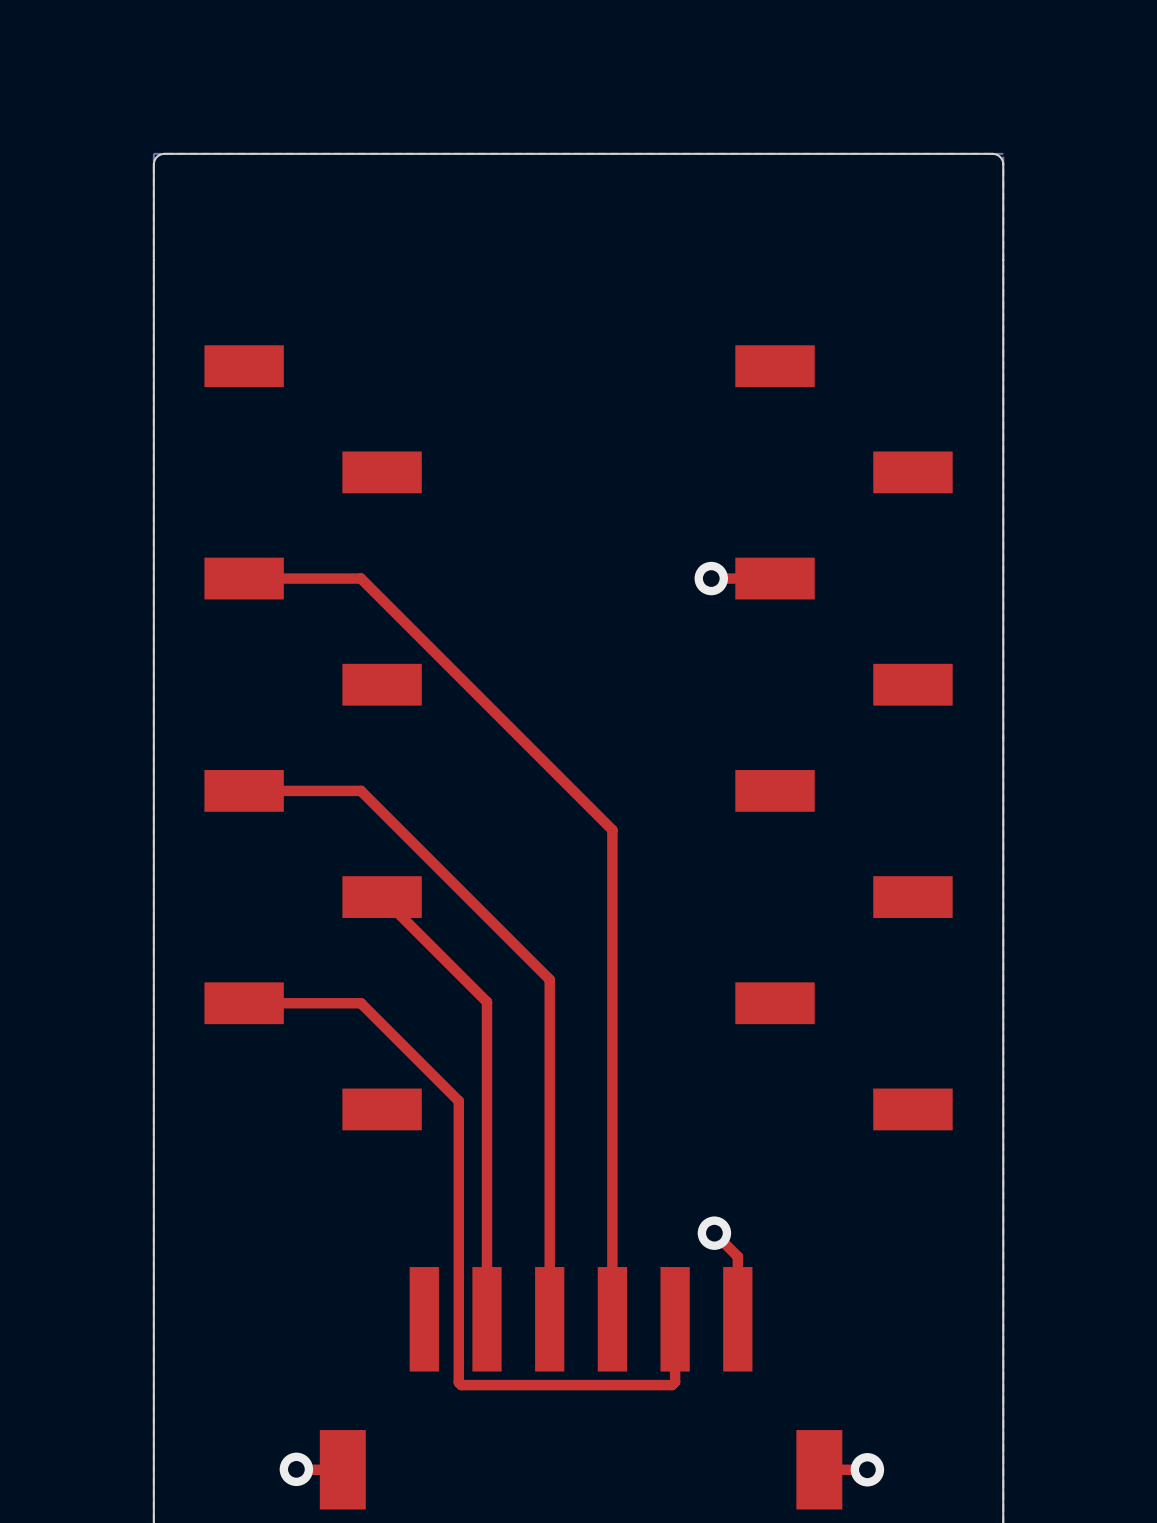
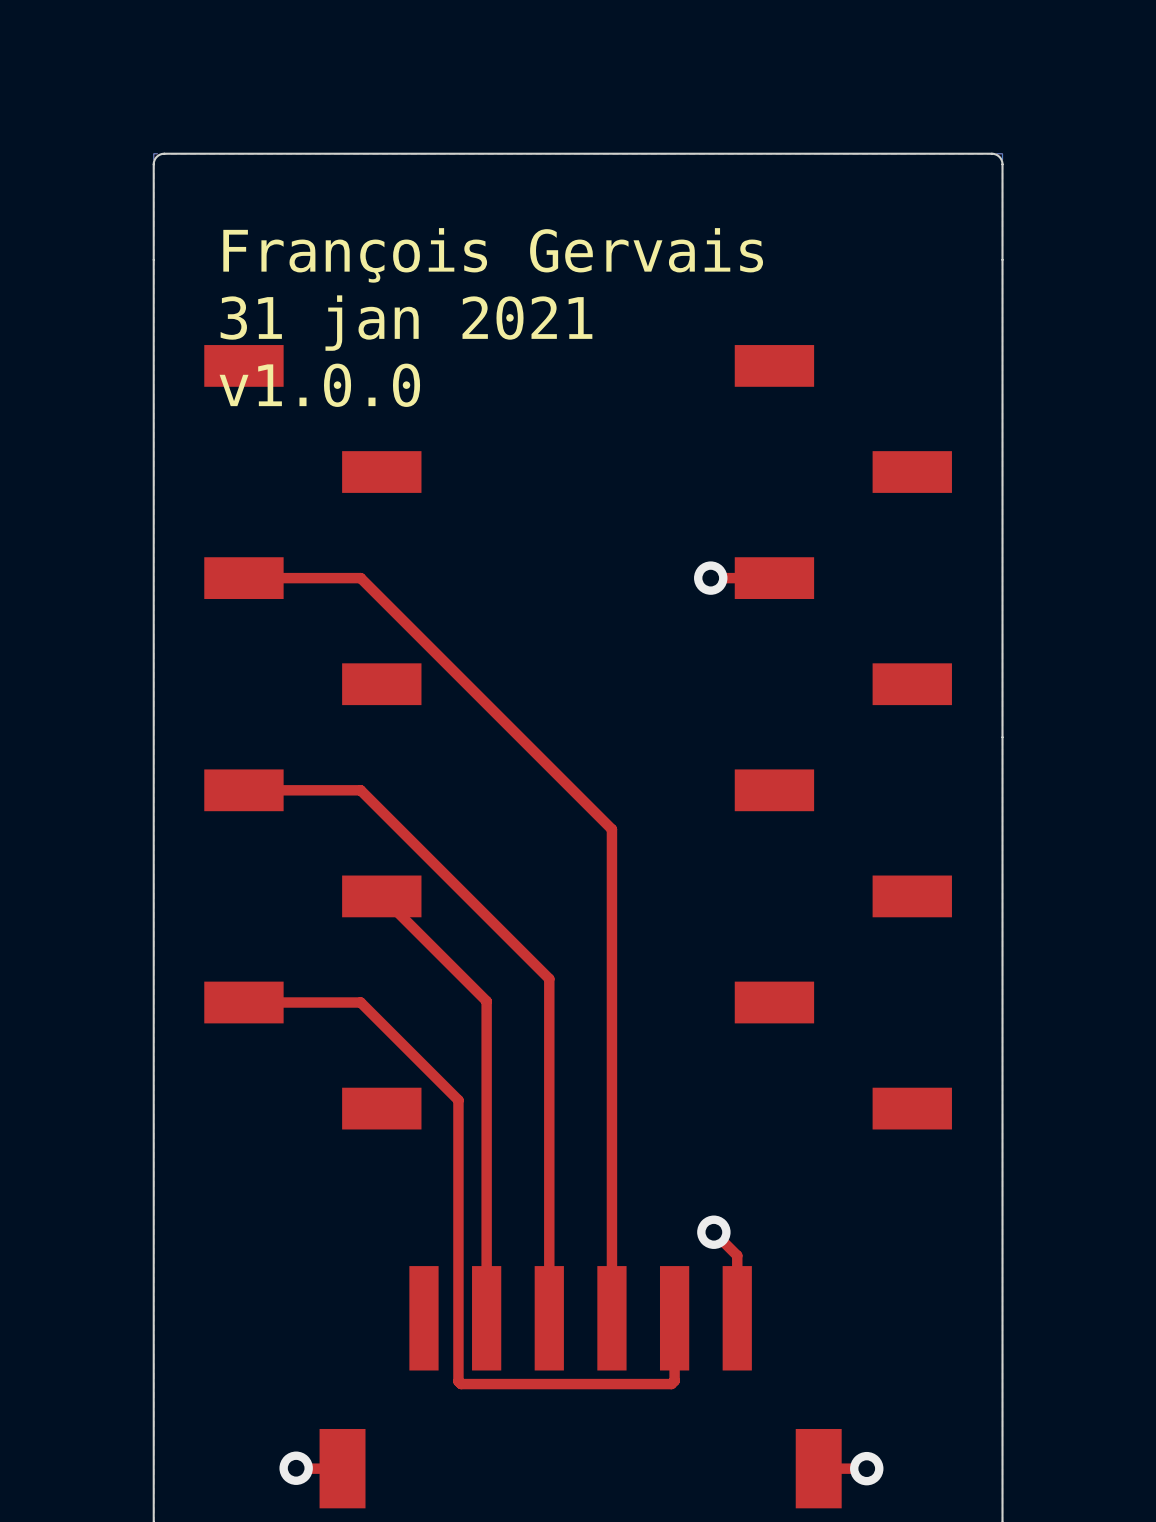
text: none -> François Gervais (493, 255)
text: none -> 31 jan 2021 (406, 323)
text: none -> v1.0.0 (319, 385)

